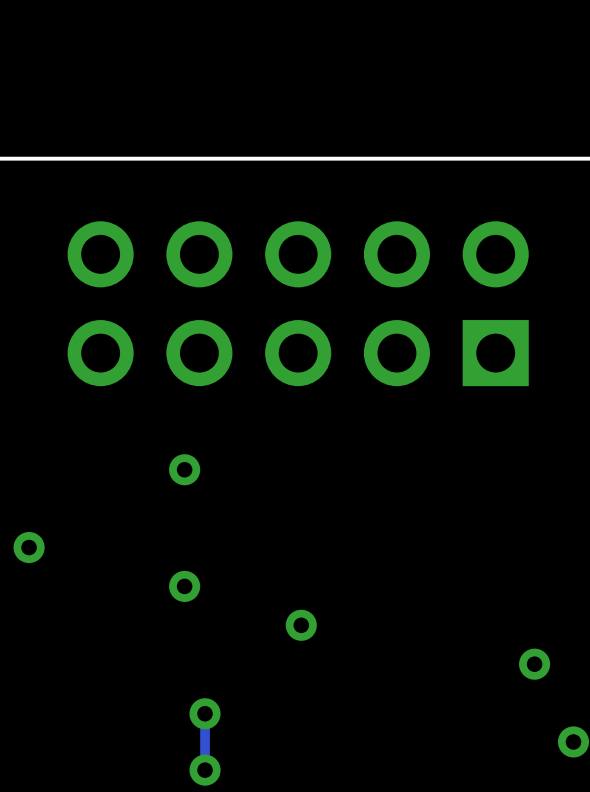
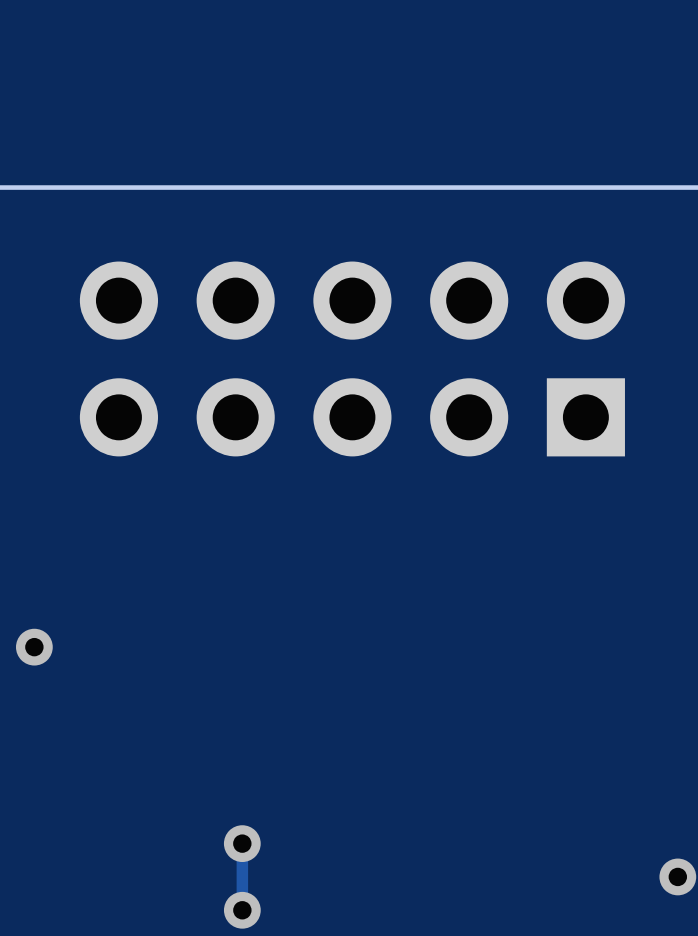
via: (184, 469) -> none
via: (184, 586) -> none
via: (301, 625) -> none
via: (534, 664) -> none

